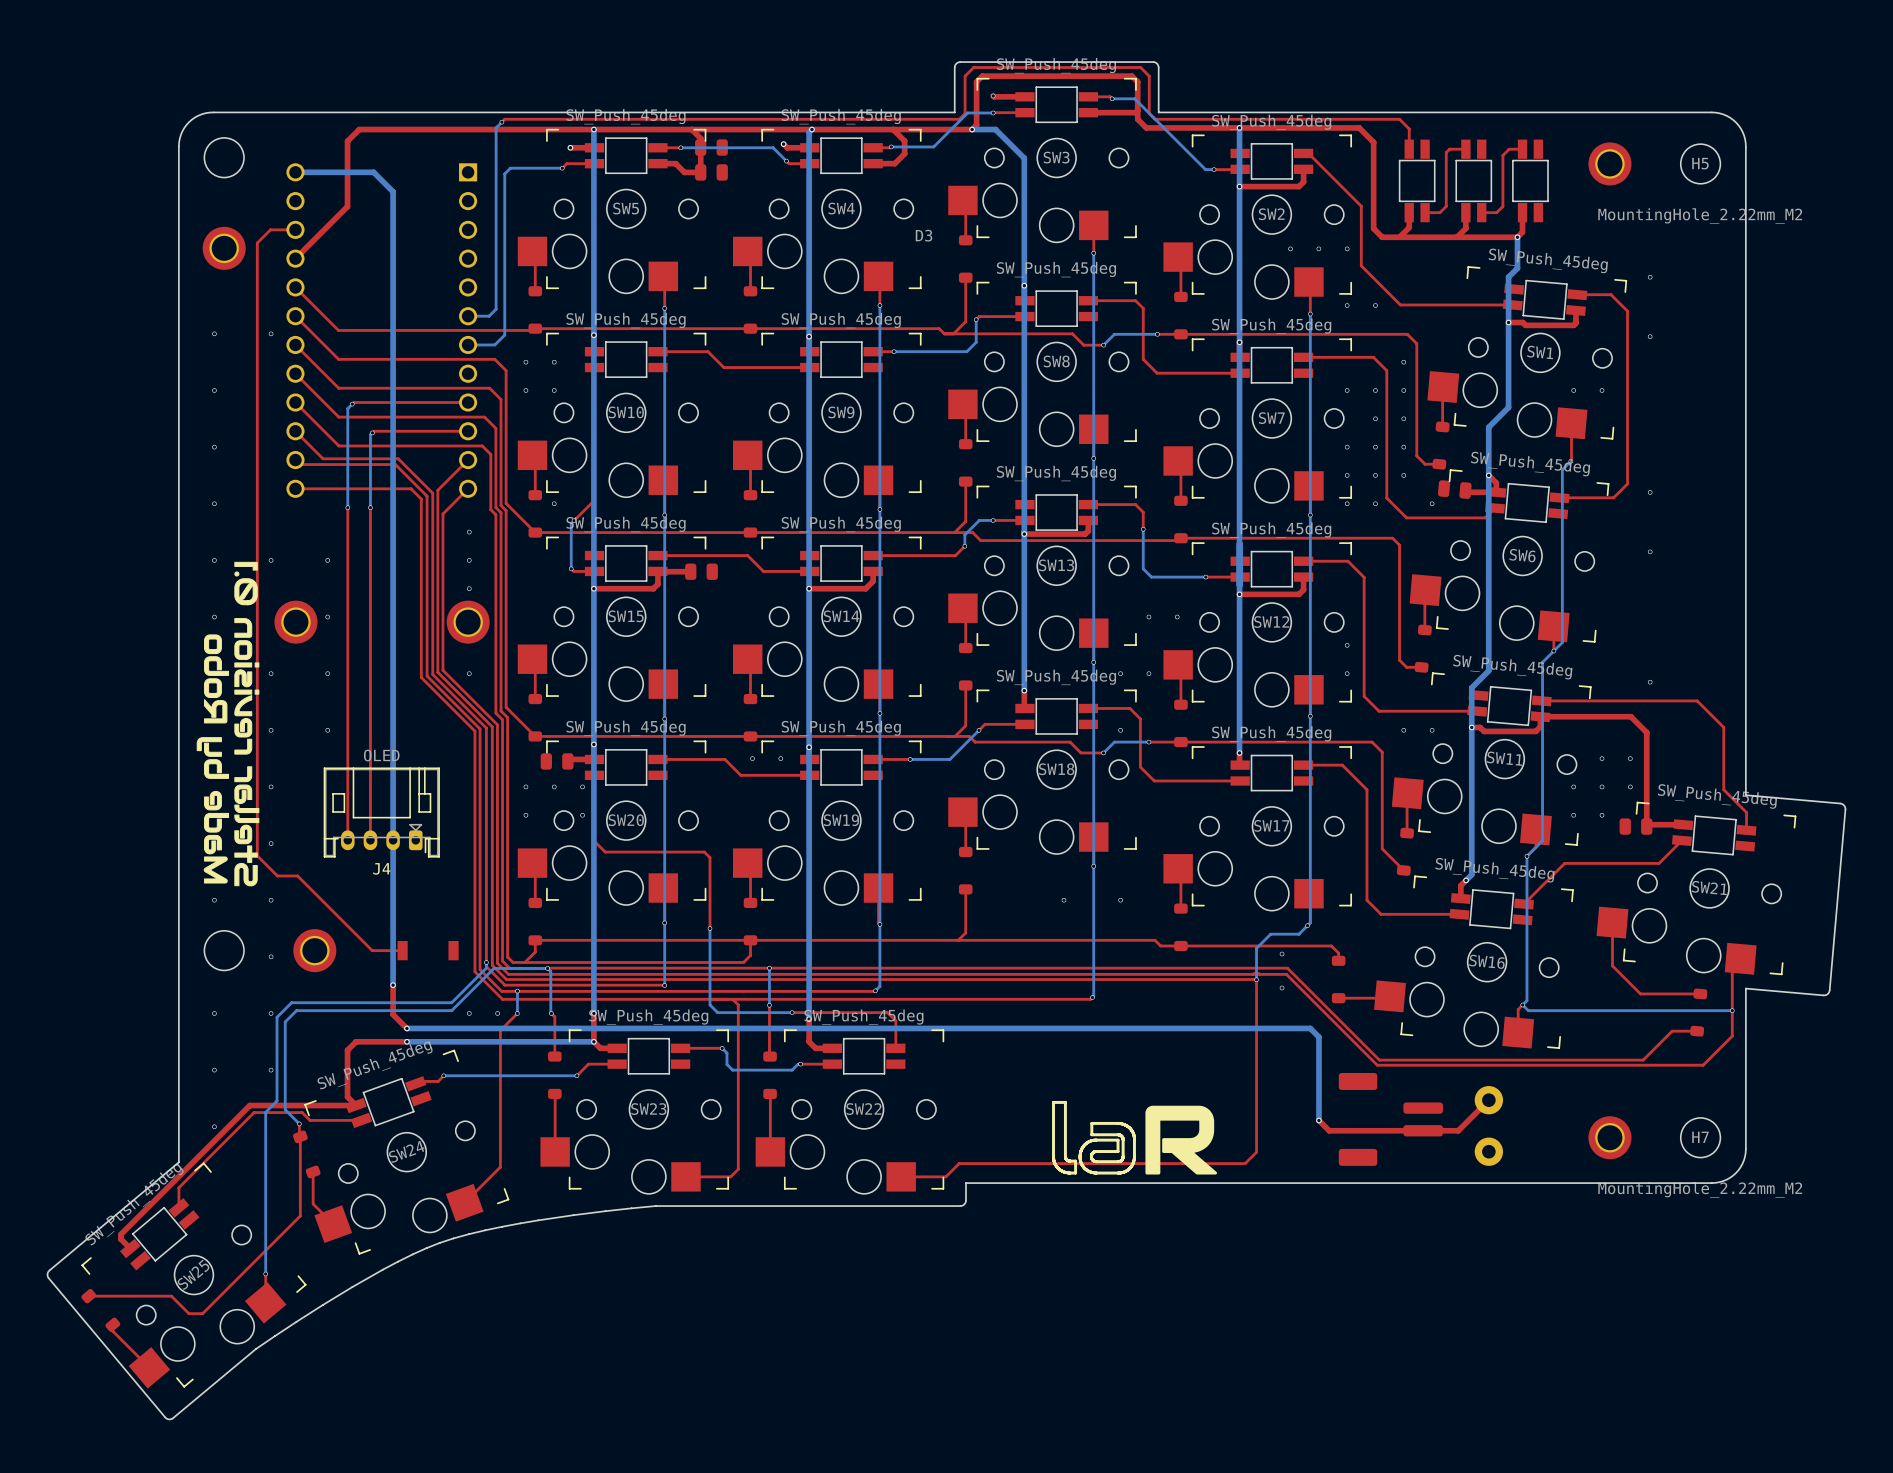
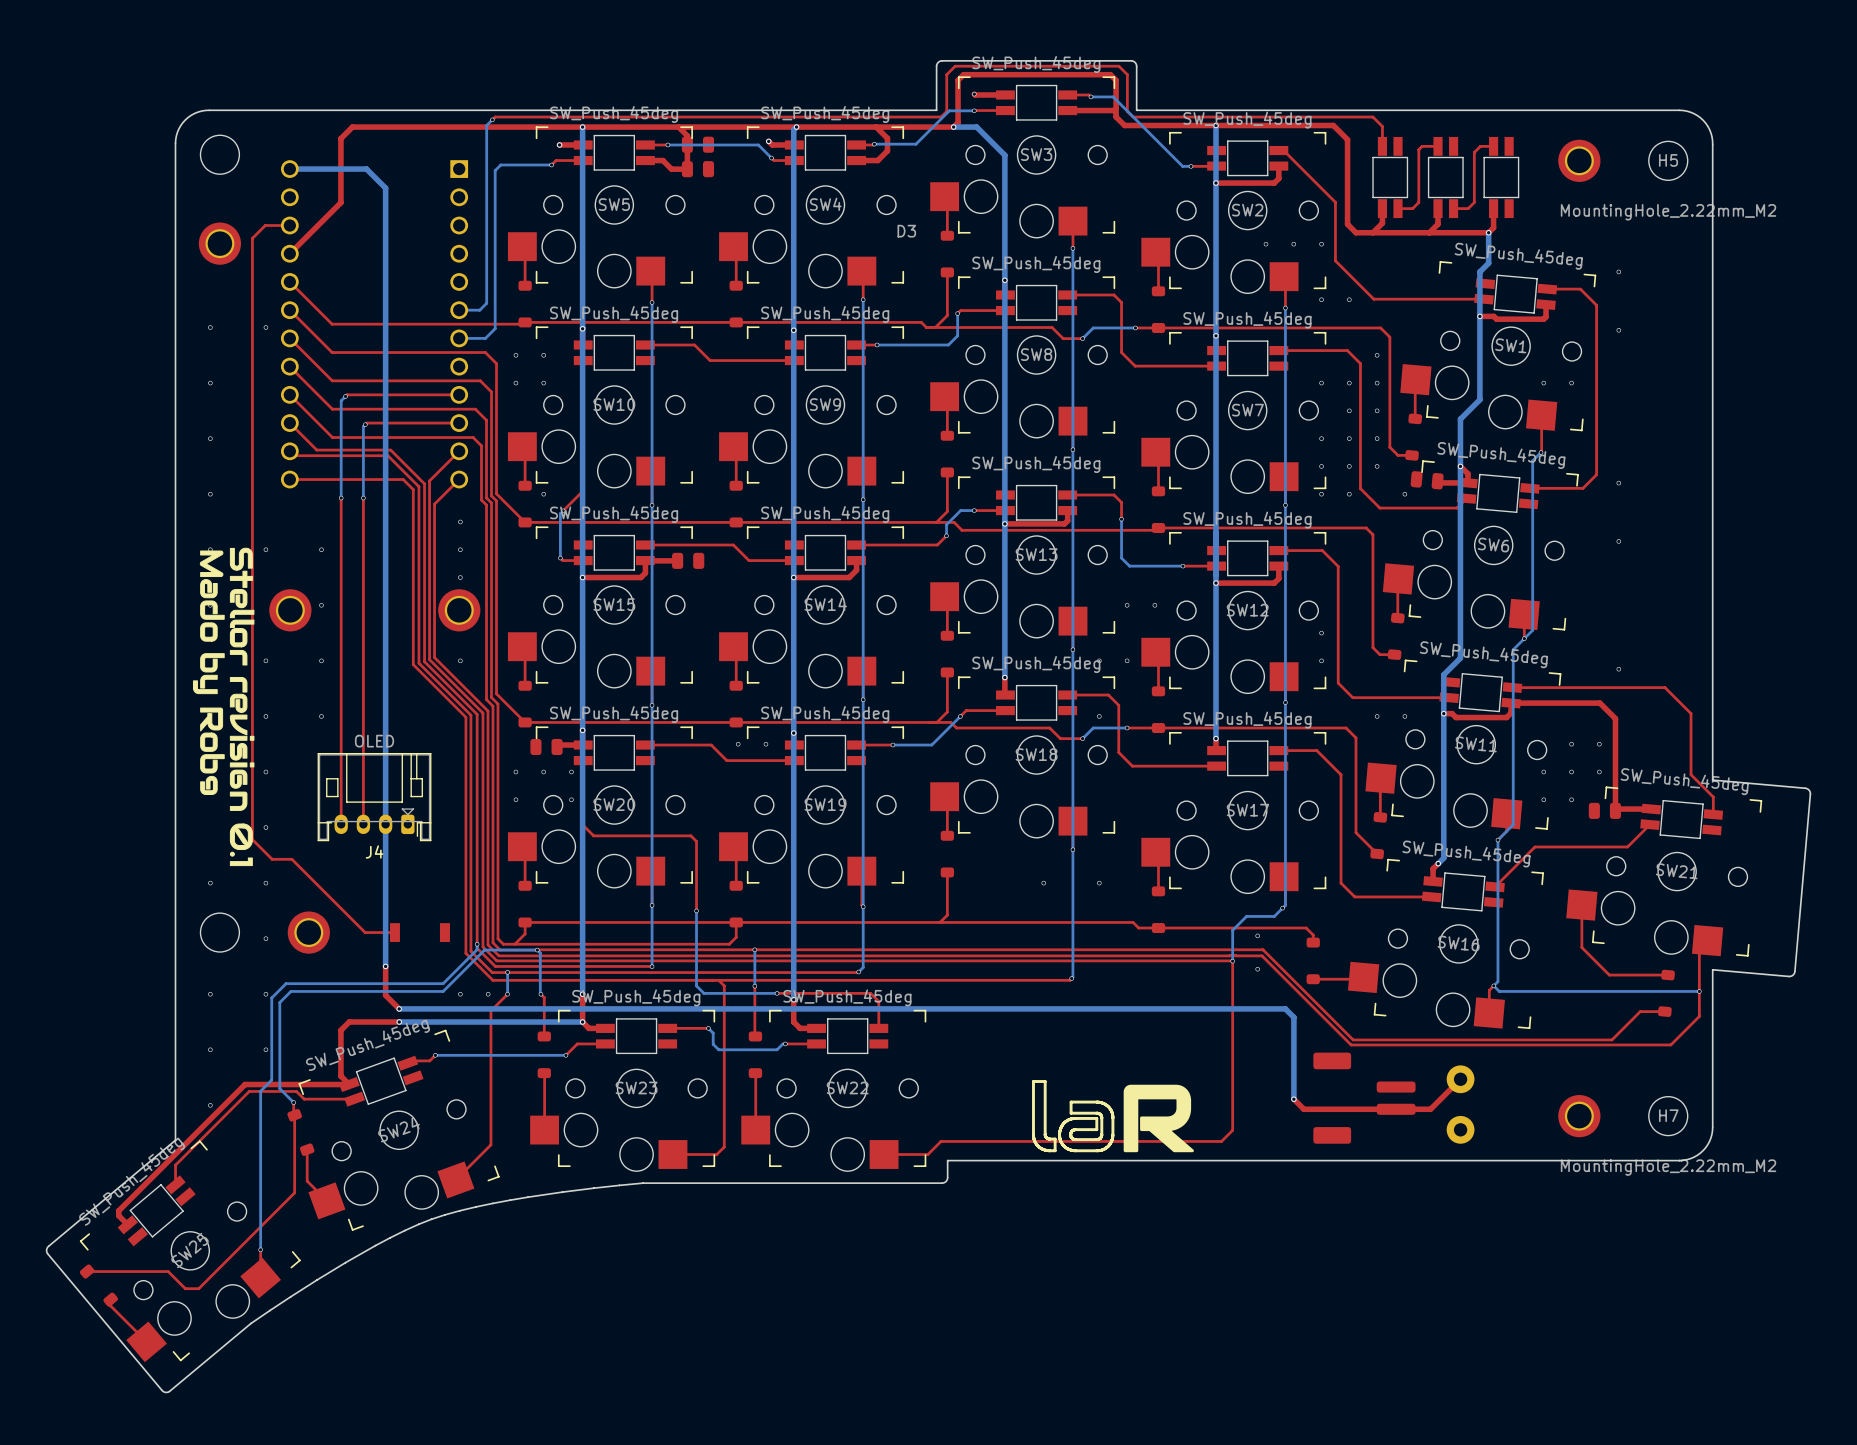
drawing: none -> [199, 550, 255, 628]
drawing shape: [234, 561, 258, 571] -> [229, 547, 253, 571]
drawing: [234, 571, 258, 606] -> none
drawing shape: [234, 618, 253, 638] -> [229, 609, 255, 619]
drawing: [196, 662, 260, 783] -> none
drawing: none -> [192, 649, 255, 768]
drawing position: (216, 666) -> (212, 610)
drawing: [203, 804, 260, 884] -> none
drawing shape: [234, 814, 260, 824] -> [229, 791, 248, 811]
drawing position: (216, 822) -> (212, 763)
drawing: none -> [229, 823, 253, 857]
drawing shape: [234, 862, 258, 887] -> [229, 857, 253, 867]

